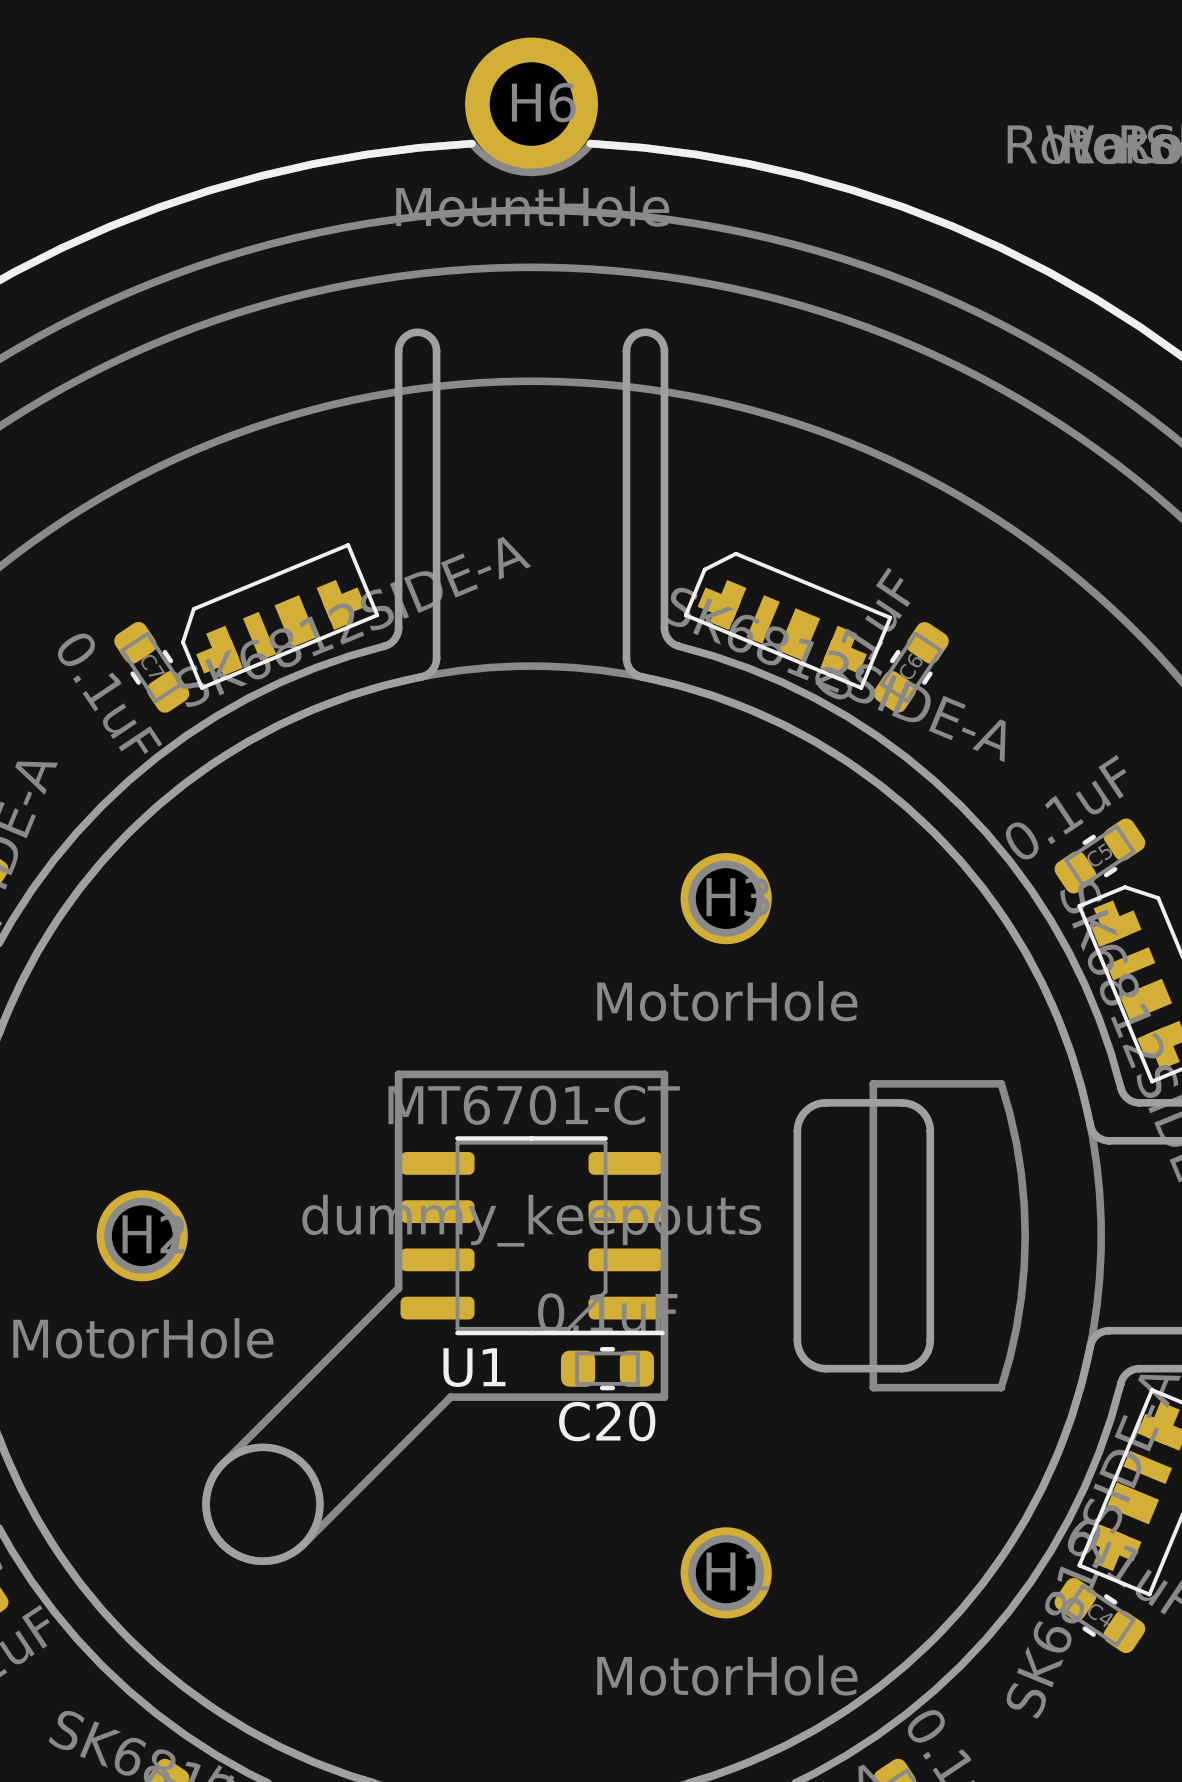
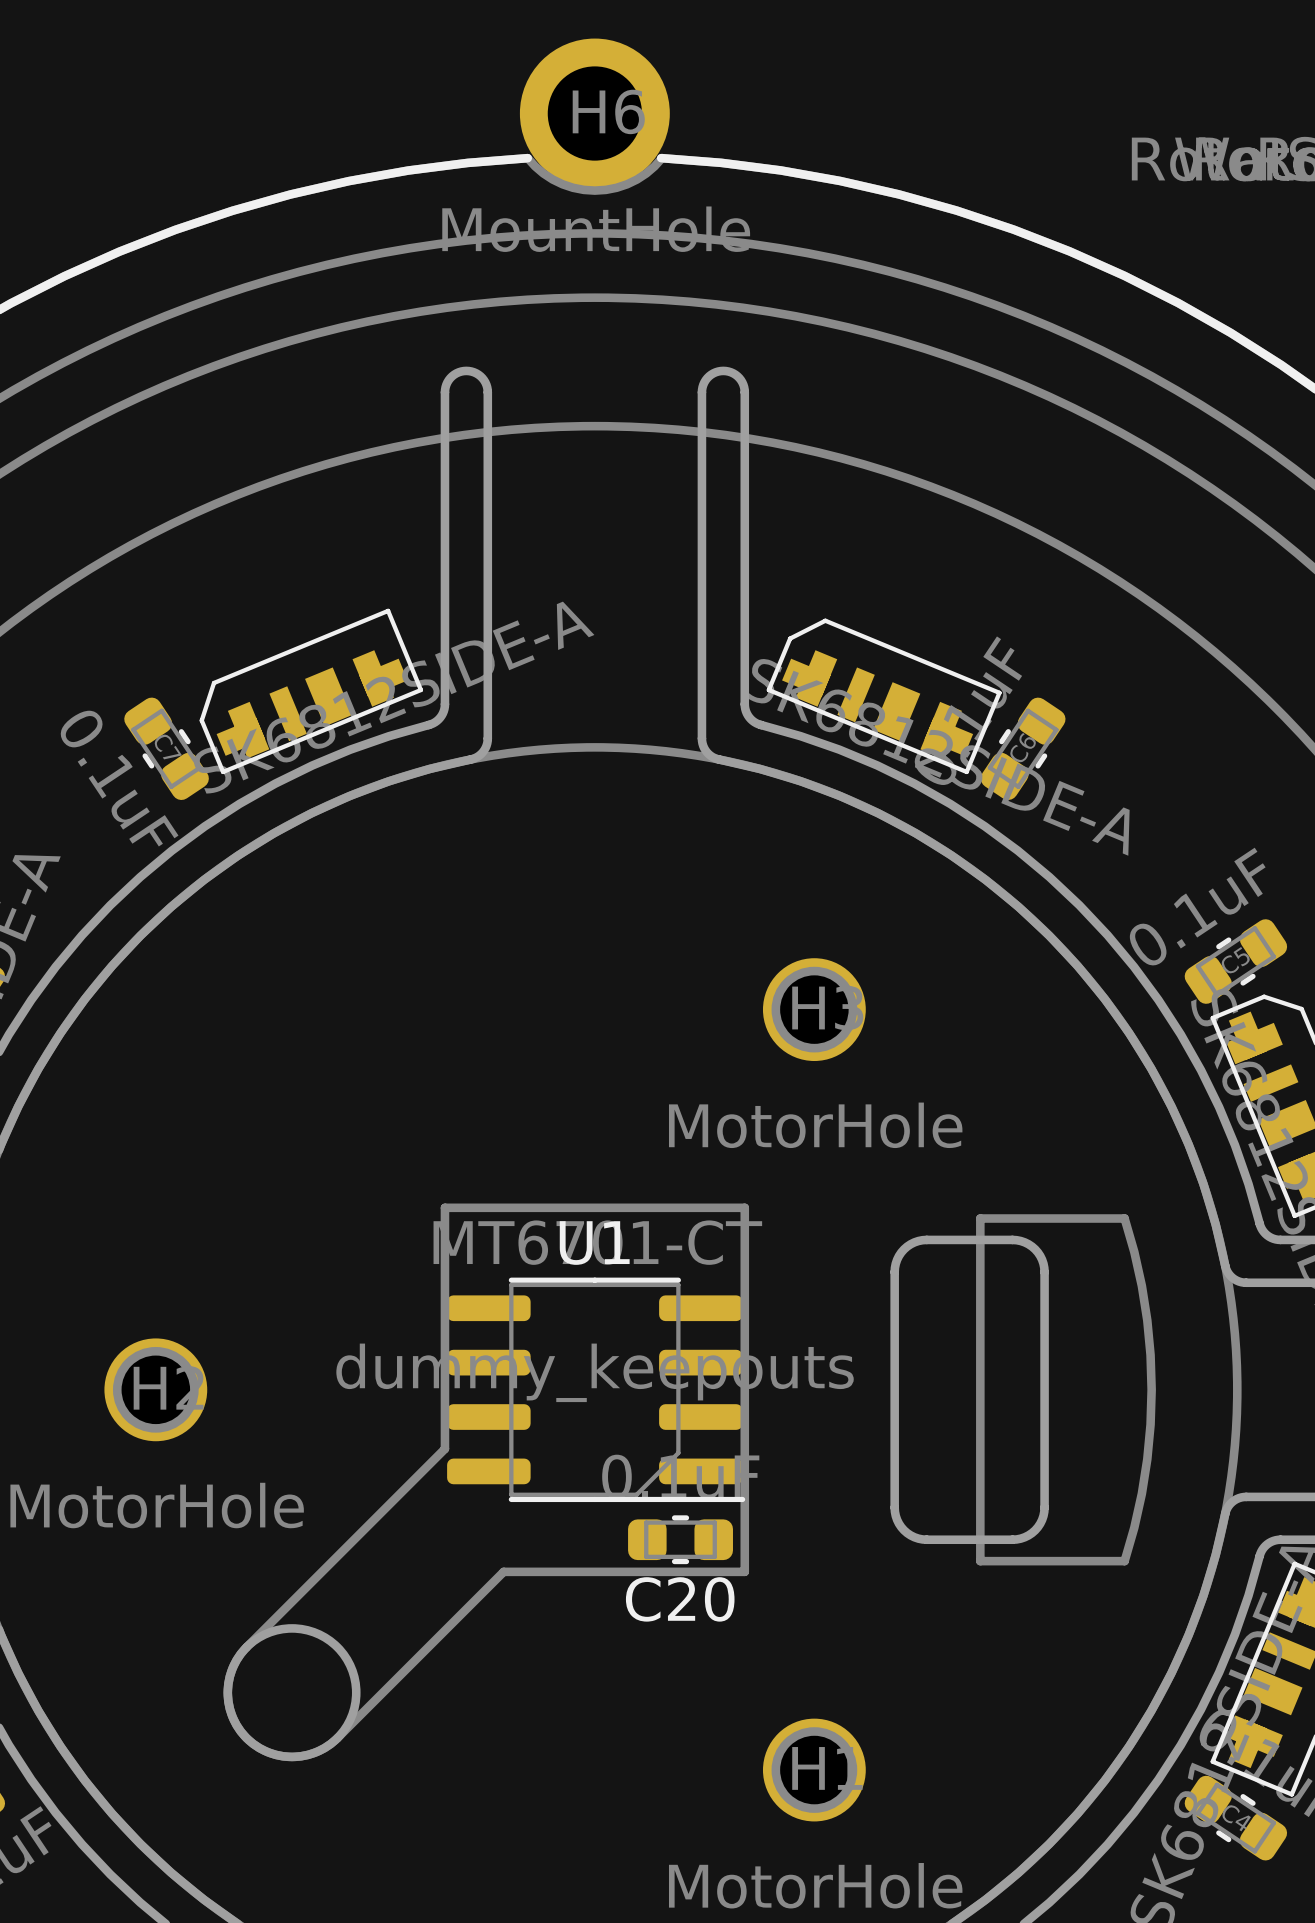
U1 name position: U1 (474, 1367) -> U1 (594, 1243)

